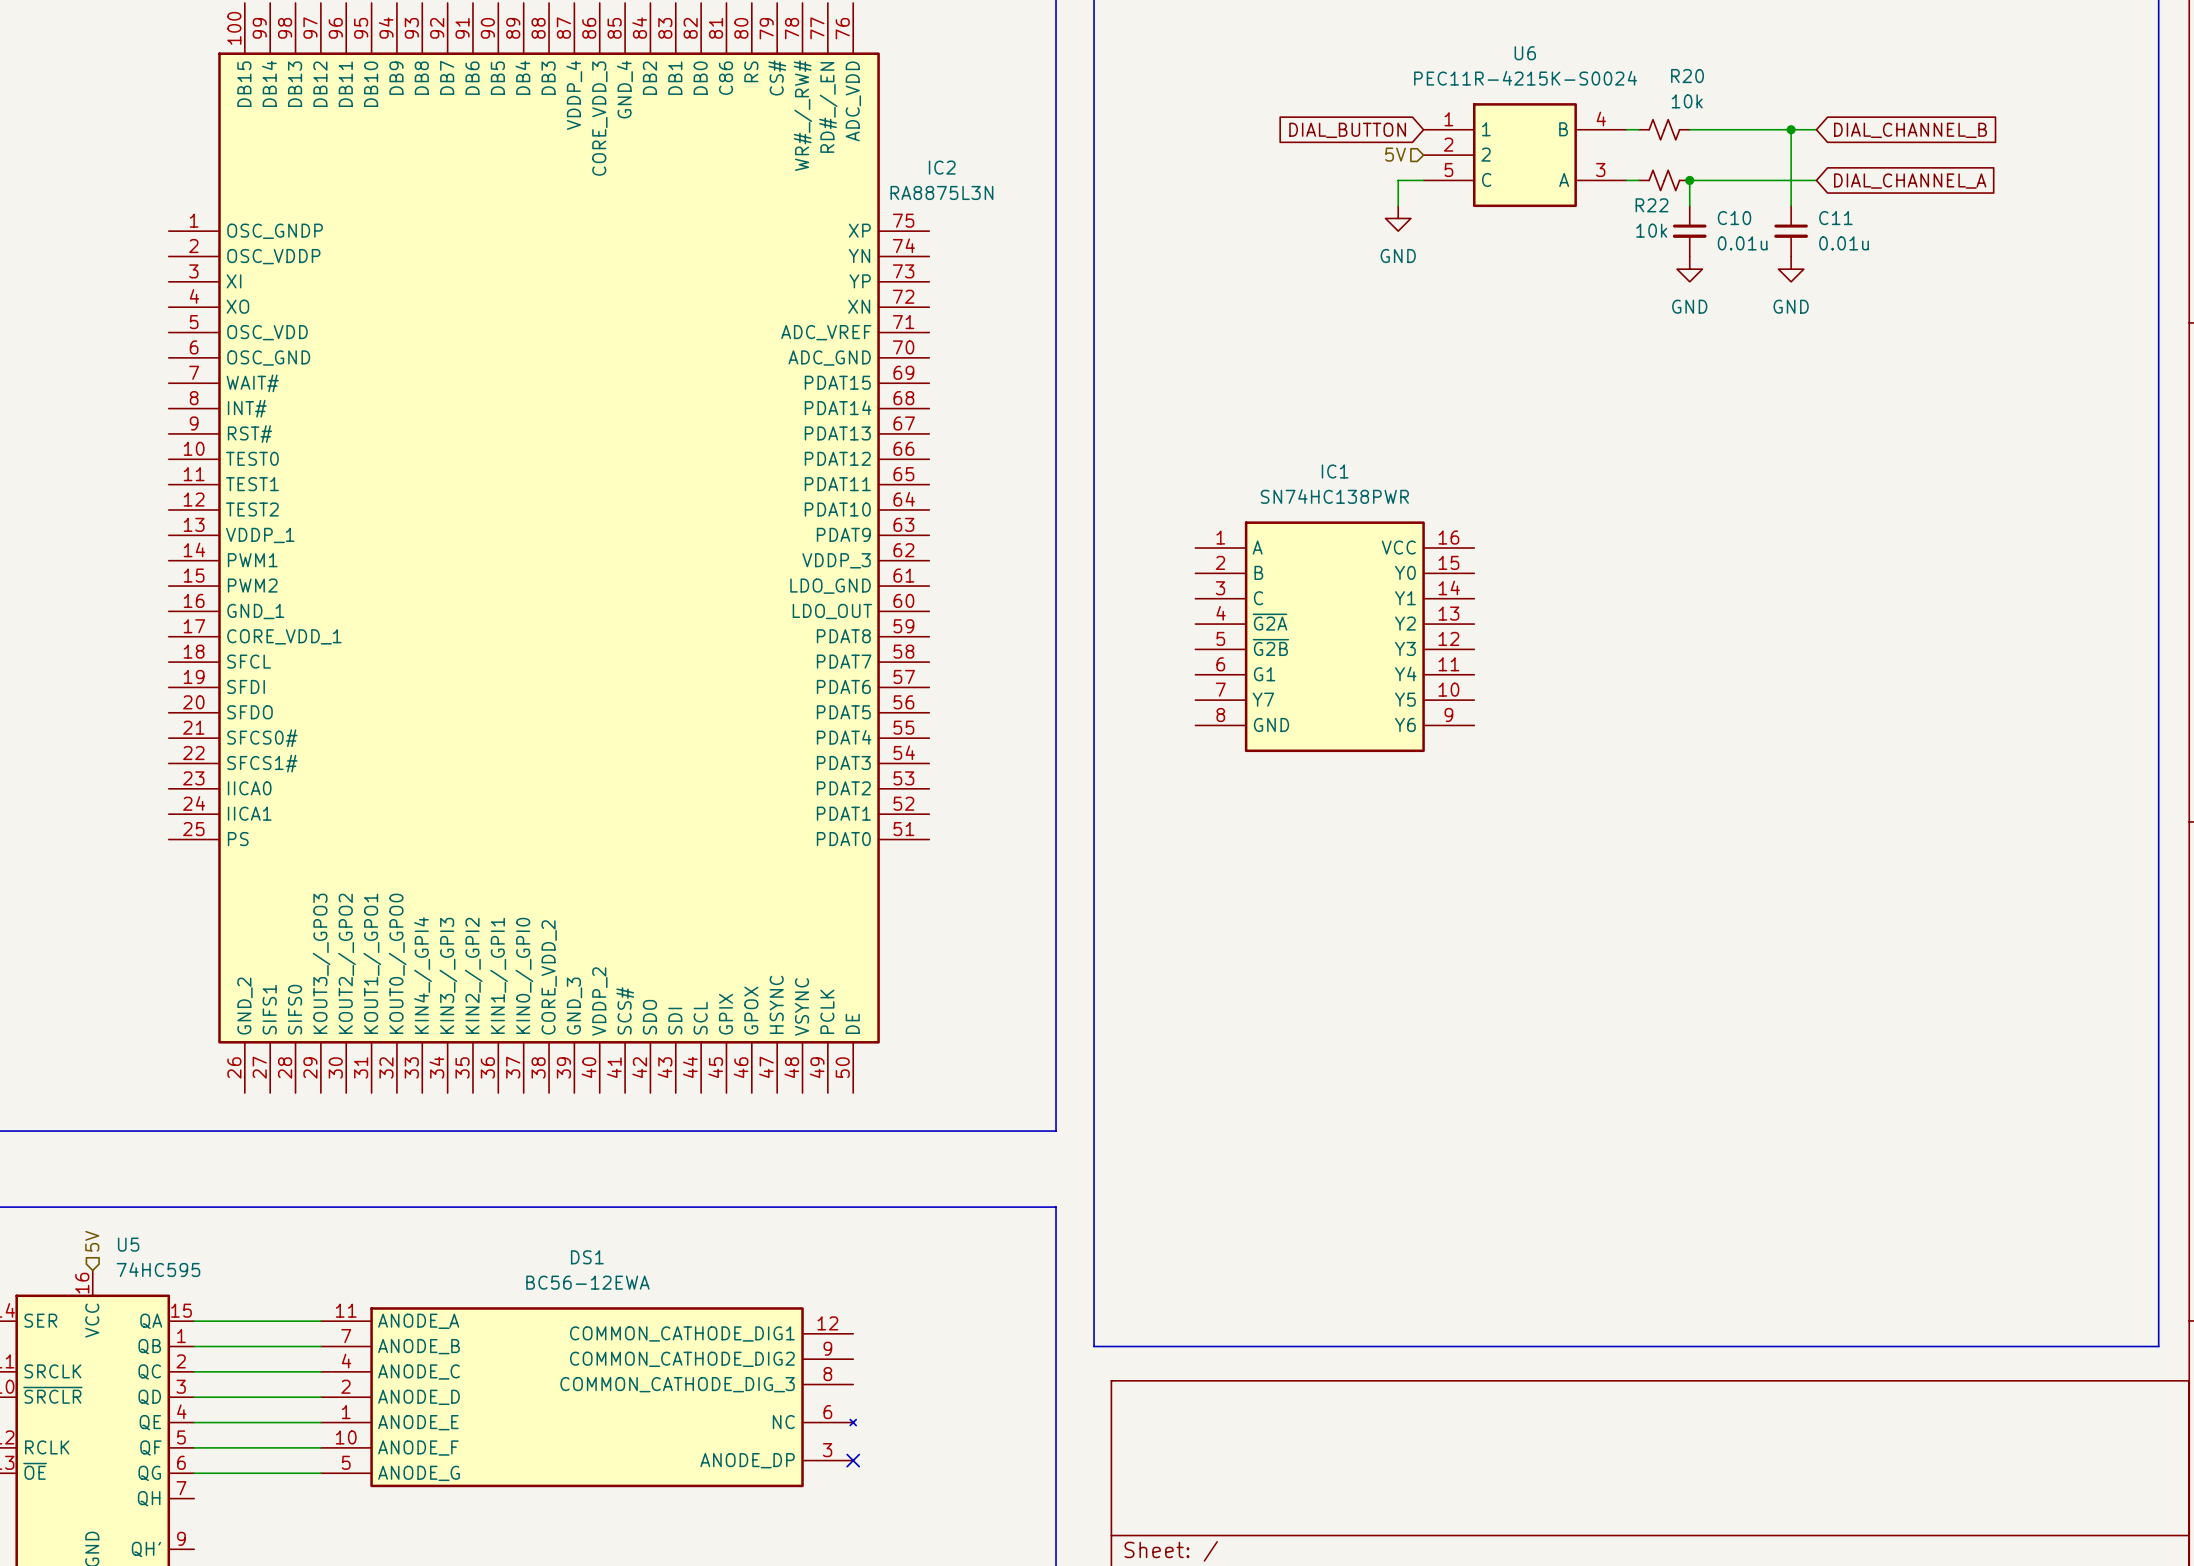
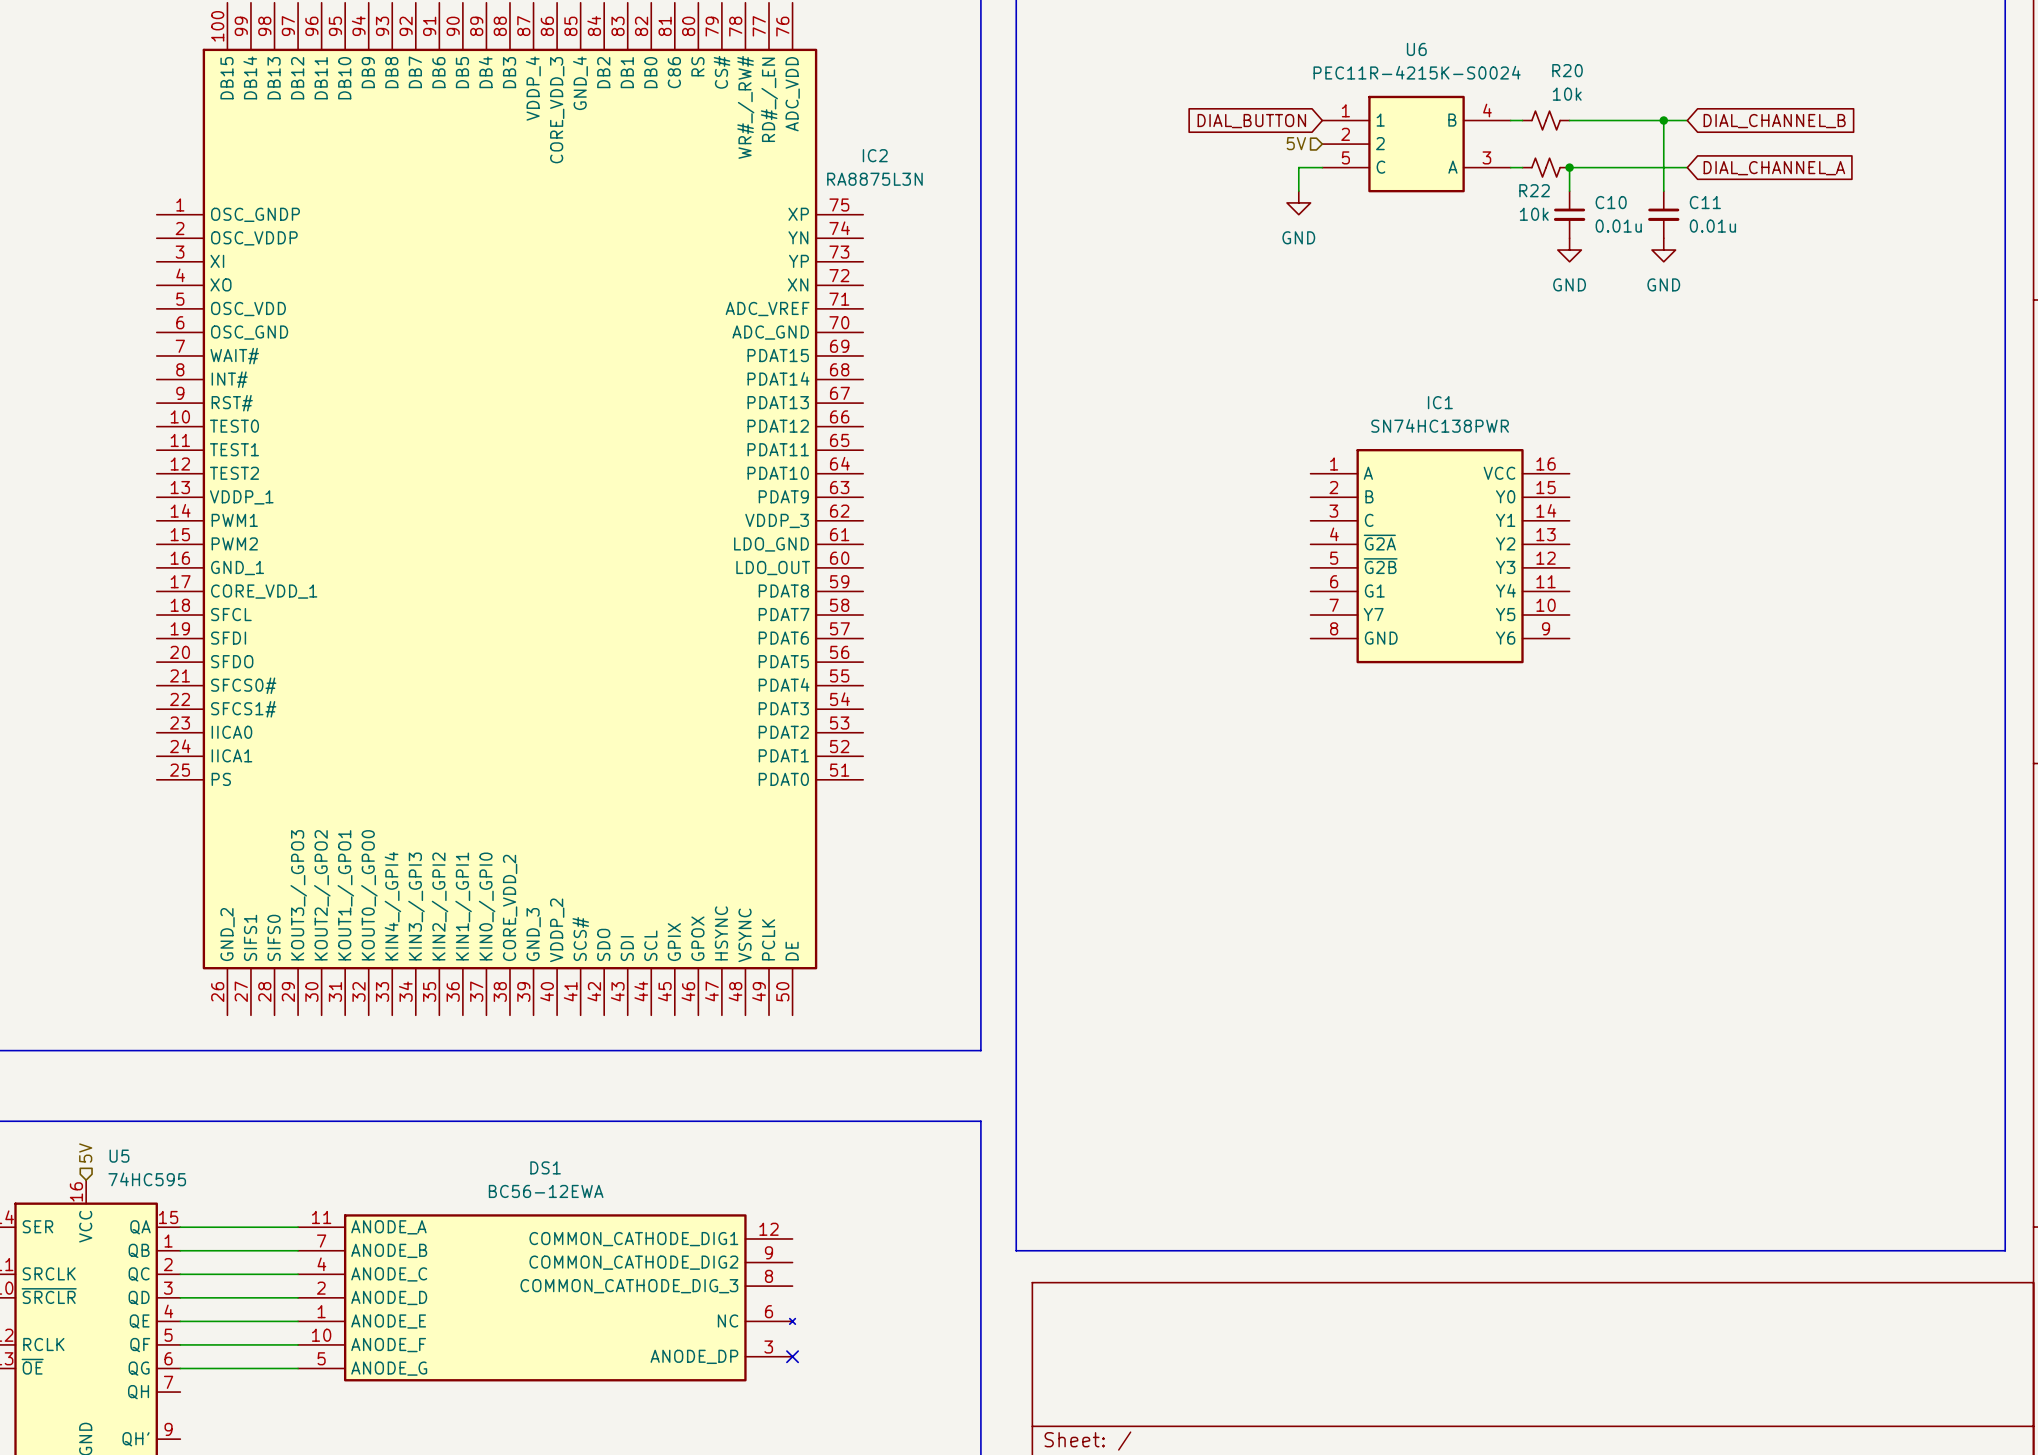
IC1 position: (1334, 636) -> (1440, 556)

